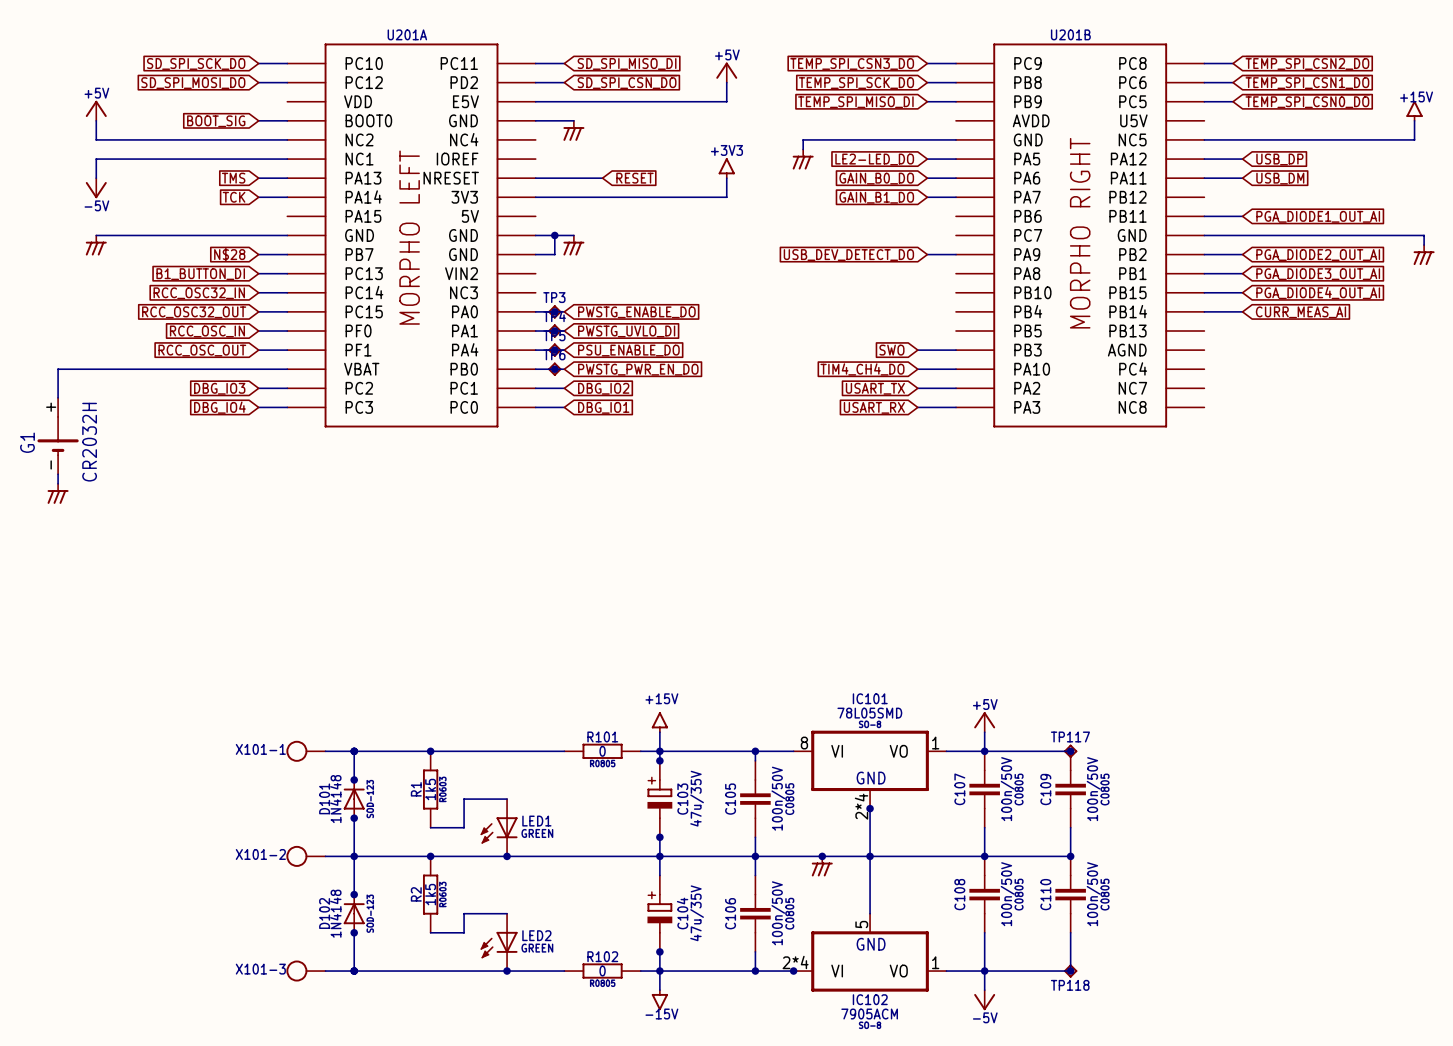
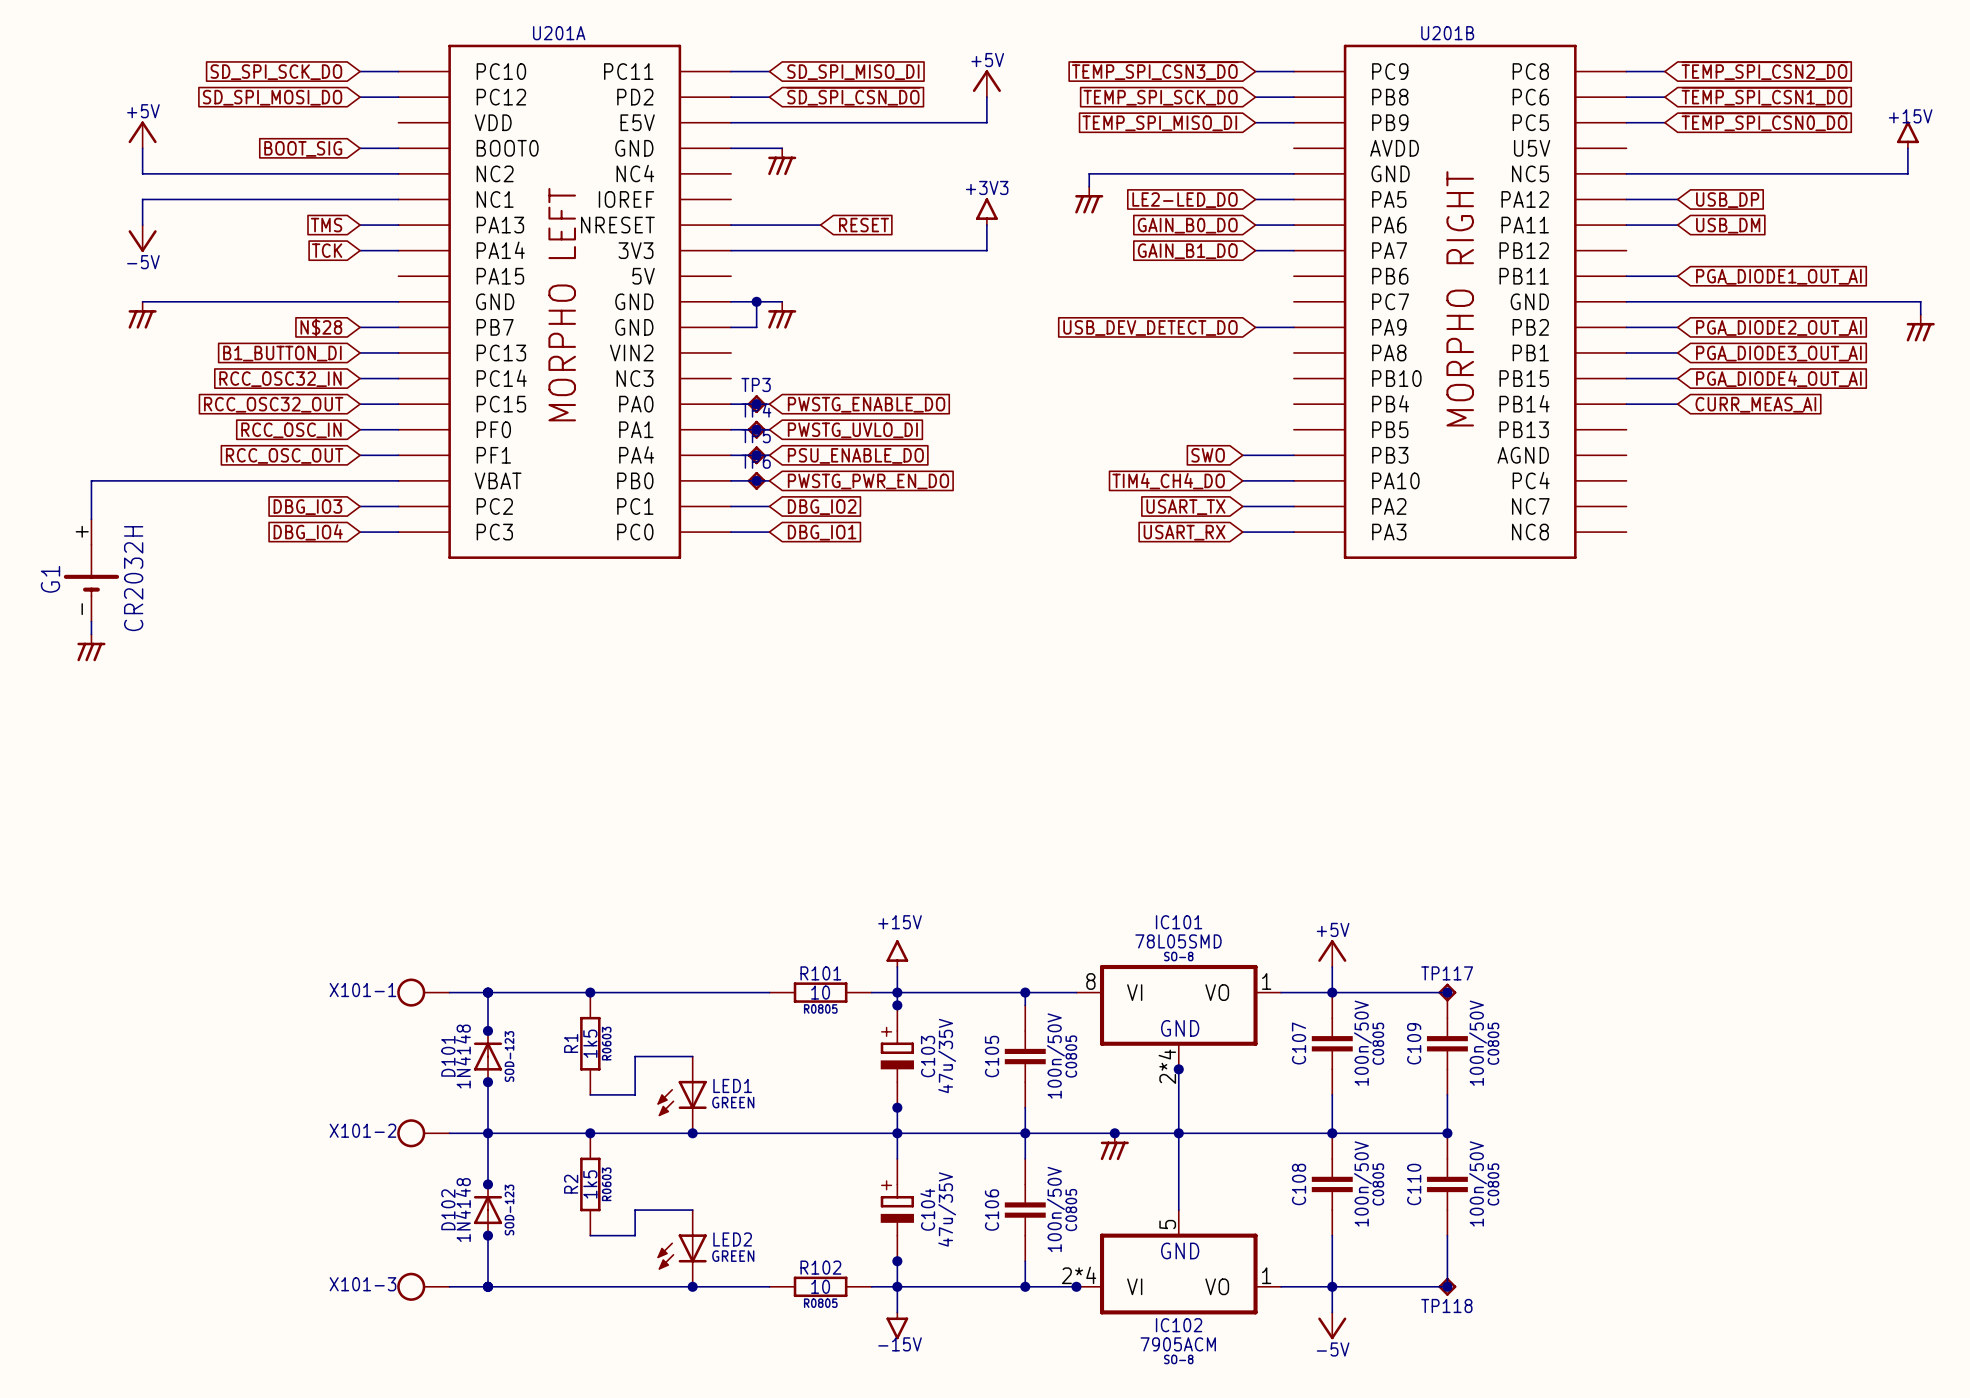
R101 value: 0 (602, 751) -> 10 (820, 992)
R102 value: 0 (602, 971) -> 10 (820, 1286)

